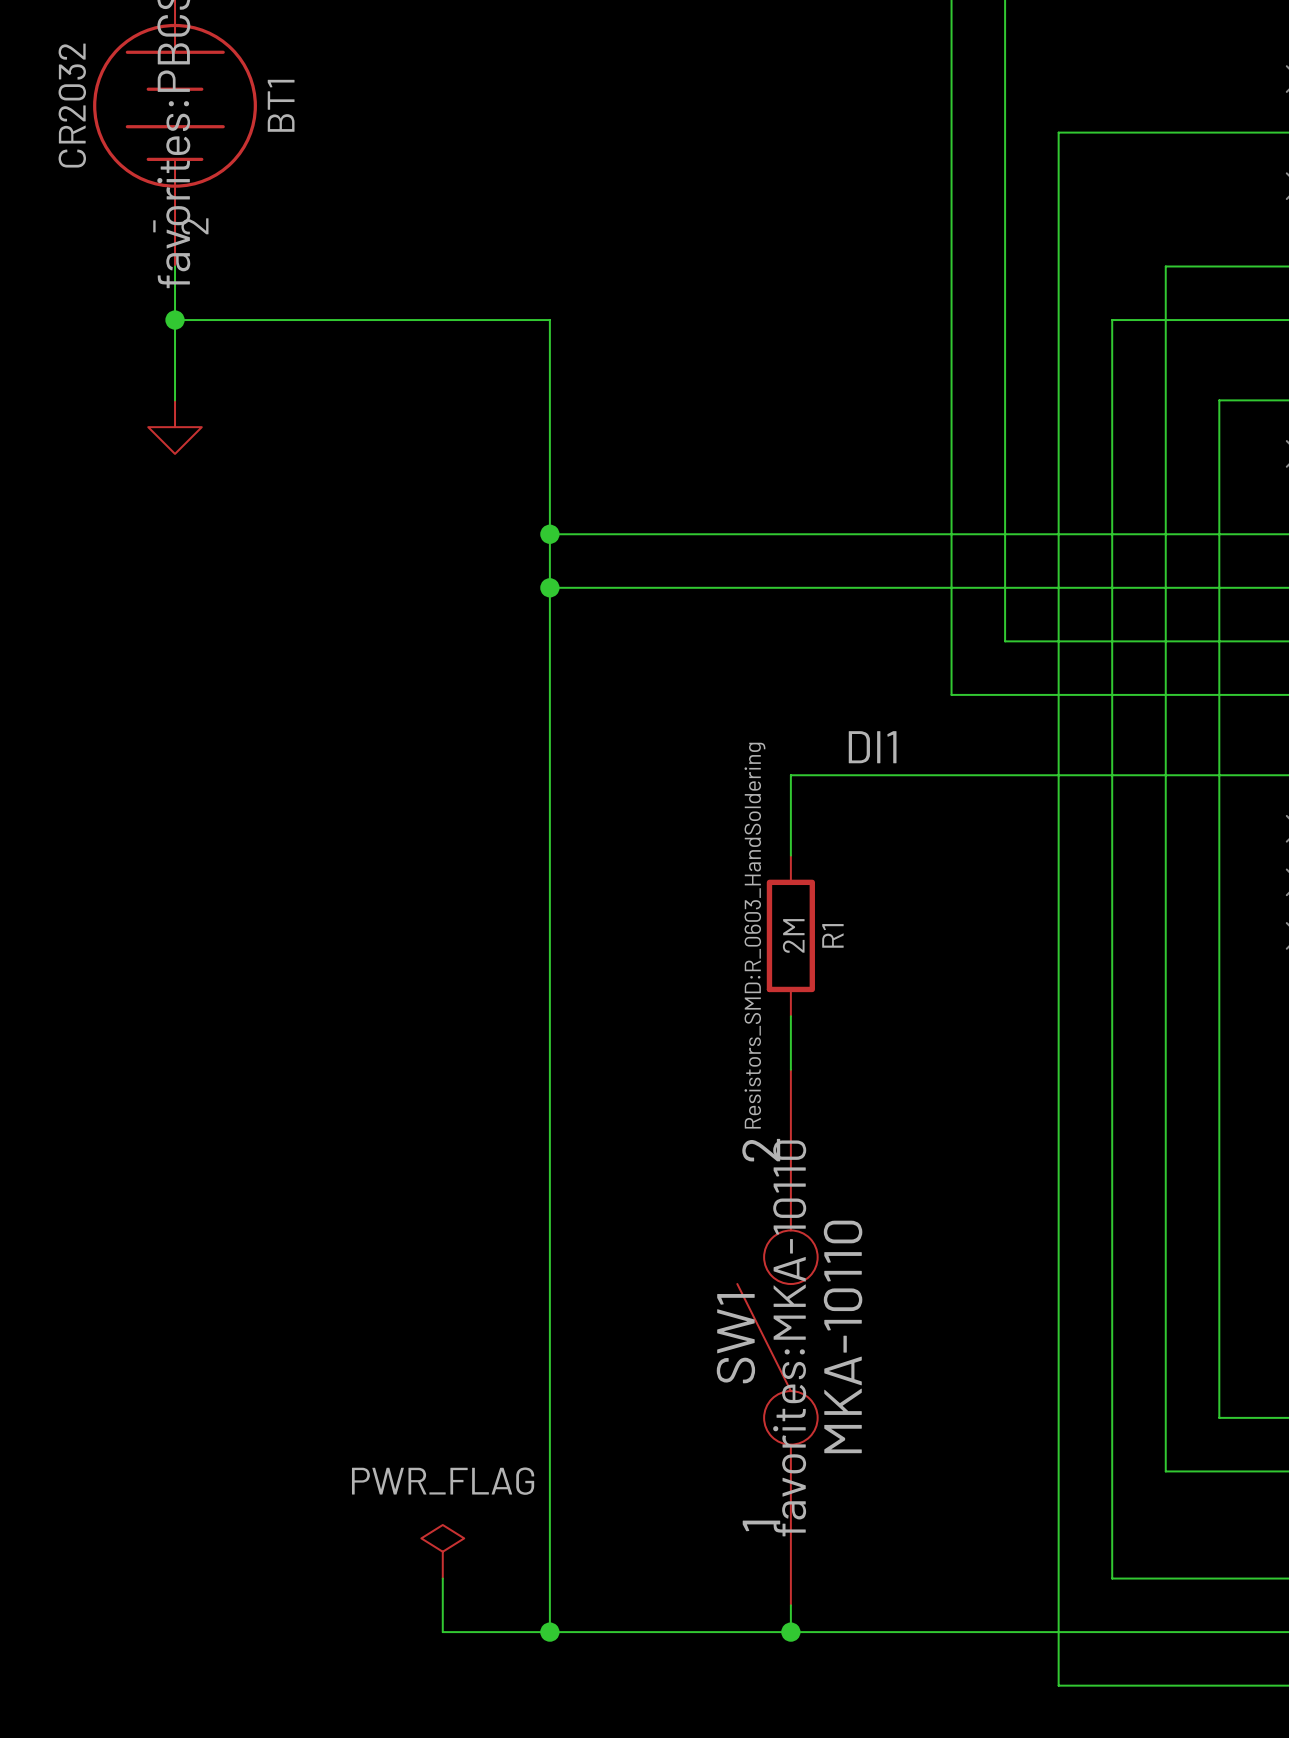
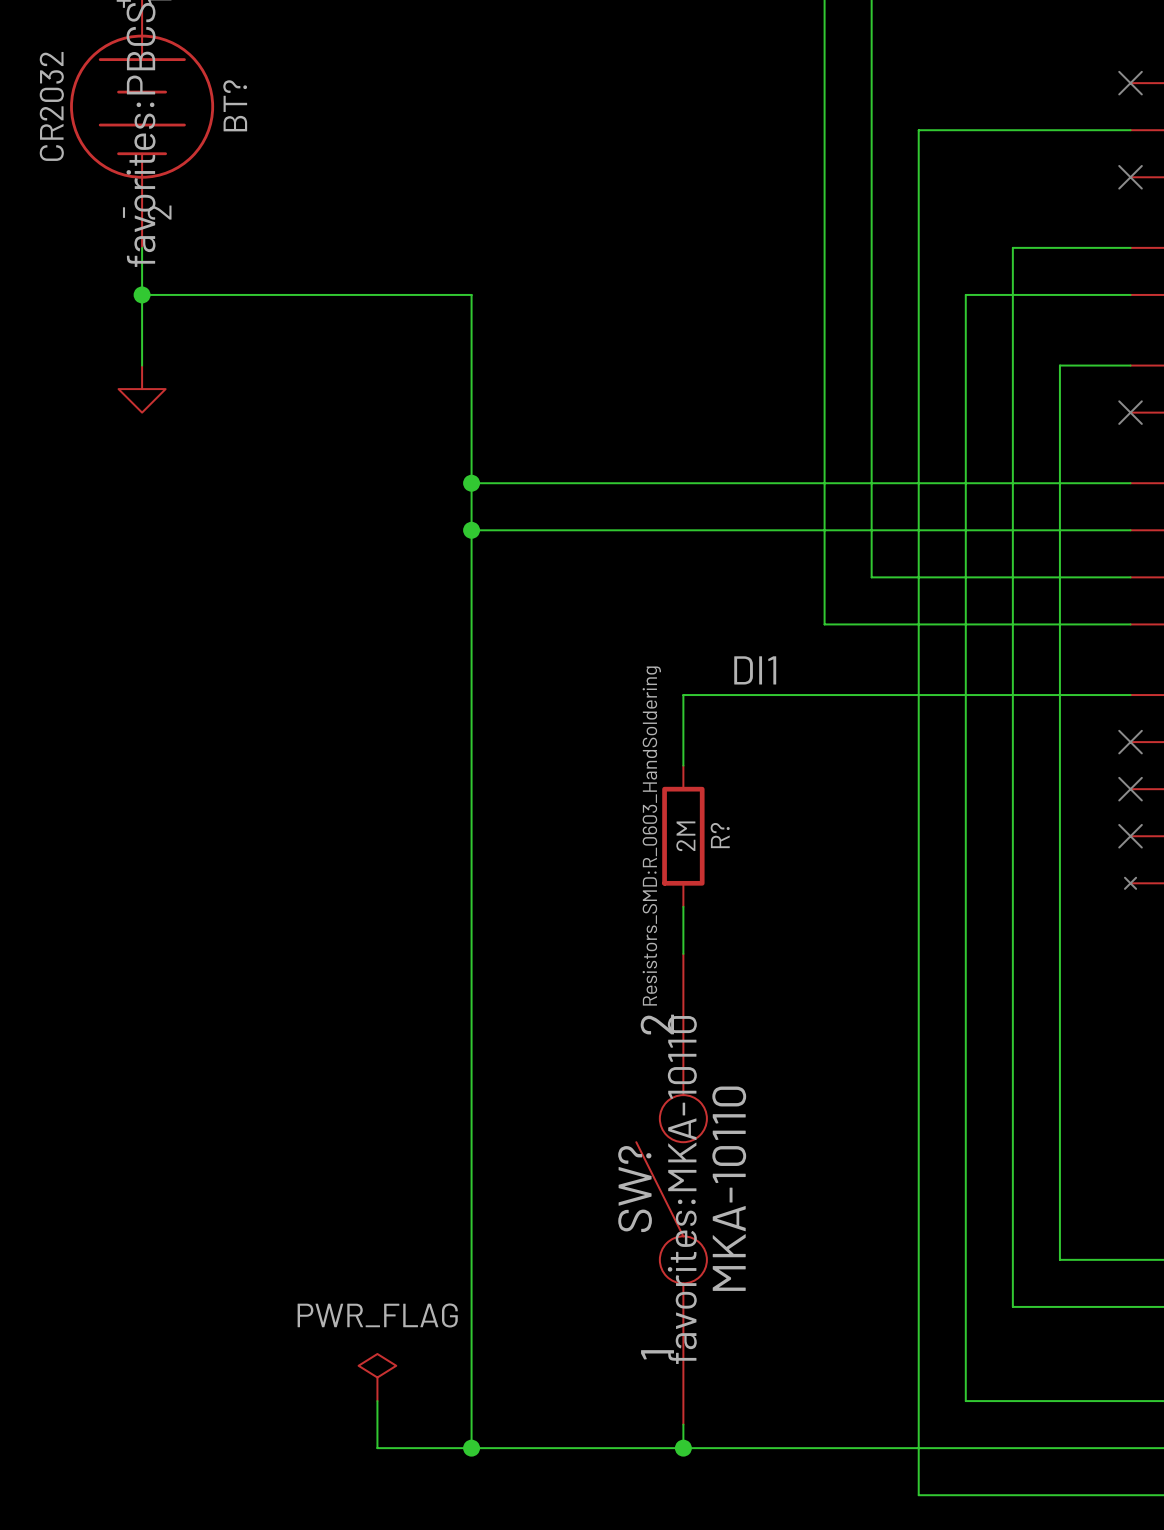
BT1 name: BT1 (281, 105) -> BT? (235, 105)
R1 name: R1 (832, 935) -> R? (720, 835)
SW1 name: SW1 (735, 1338) -> SW? (635, 1189)

